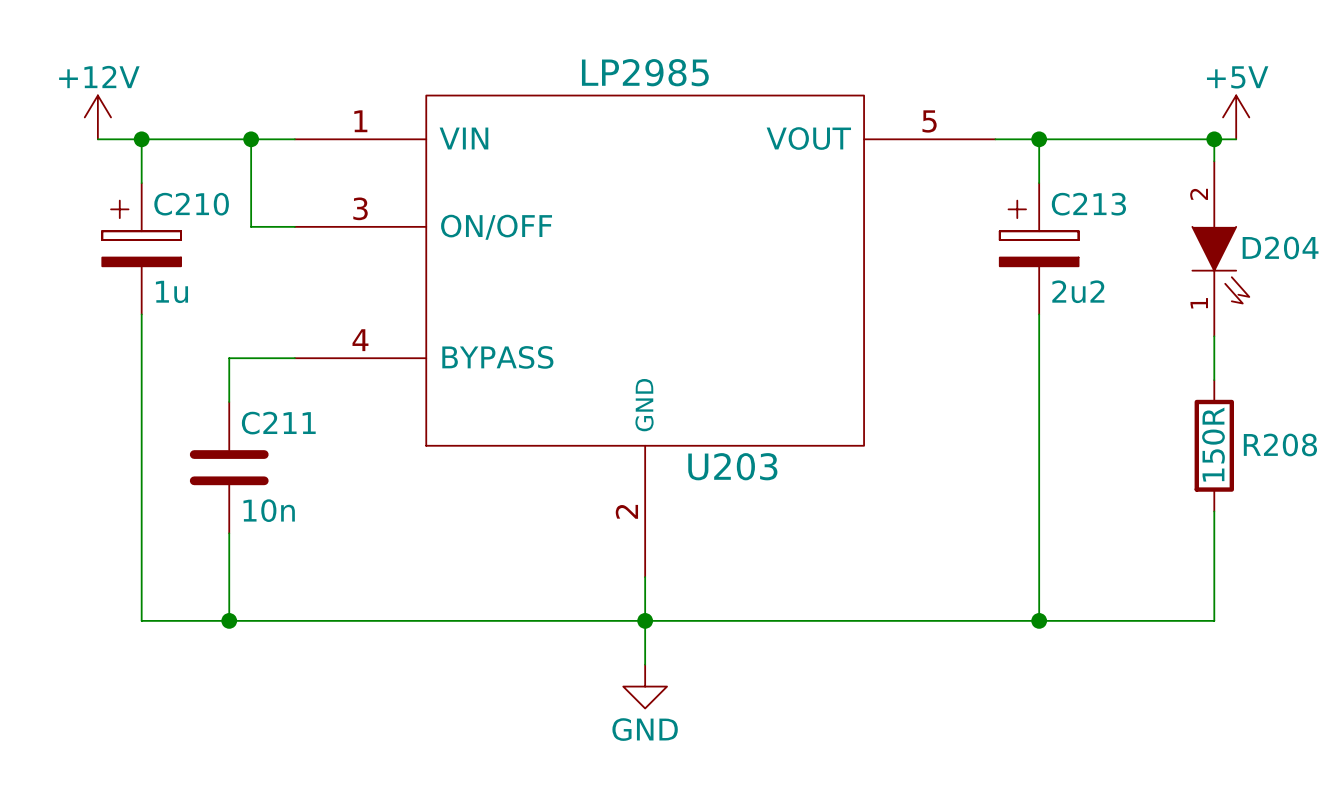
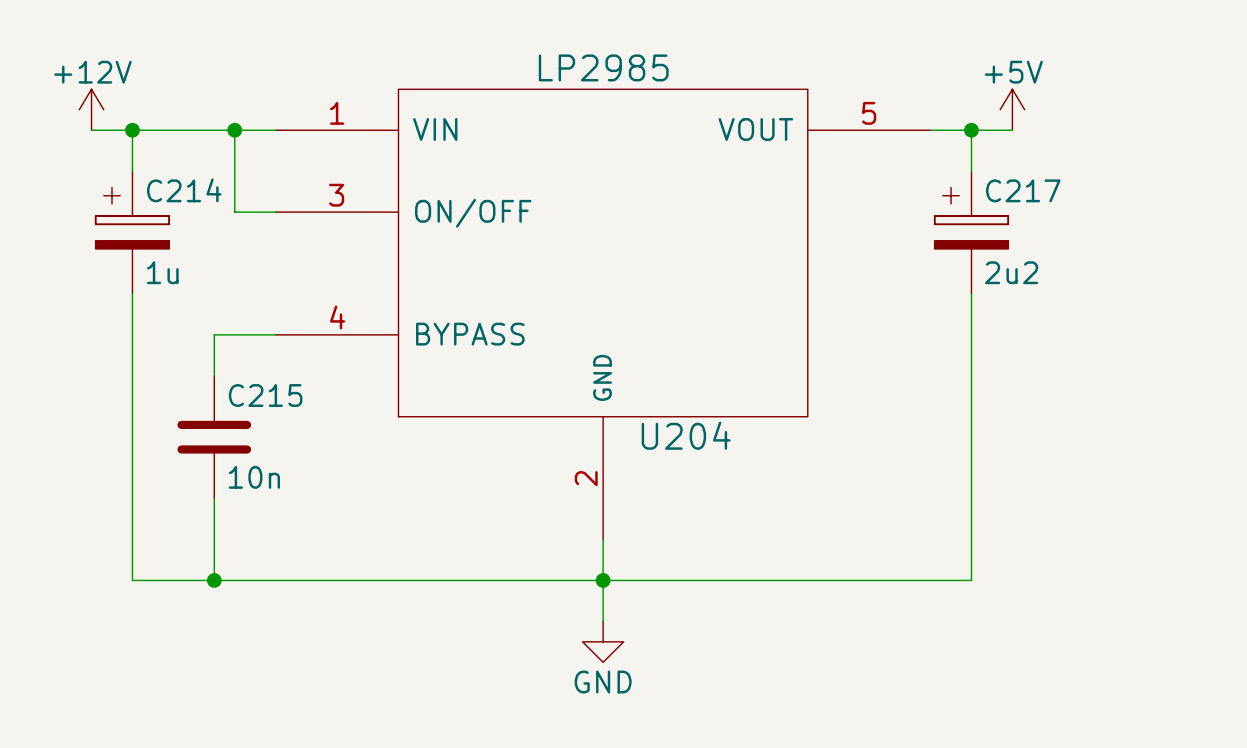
power symbol position: +5V (1236, 117) -> +5V (1012, 109)
wire: (1082, 139) (1236, 139) -> none
wire: (1214, 139) (1214, 161) -> none
junction: (1214, 139) -> none
C210 name: C210 (191, 204) -> C214 (184, 190)
C213 name: C213 (1088, 204) -> C217 (1023, 190)
D204: (1220, 248) -> none
wire: (1214, 336) (1214, 380) -> none
C211 name: C211 (278, 423) -> C215 (265, 395)
R208: 150R (1214, 445) -> none
U203 name: U203 (732, 466) -> U204 (686, 435)
wire: (1214, 511) (1214, 620) (1039, 620) -> none
junction: (1039, 620) -> none

